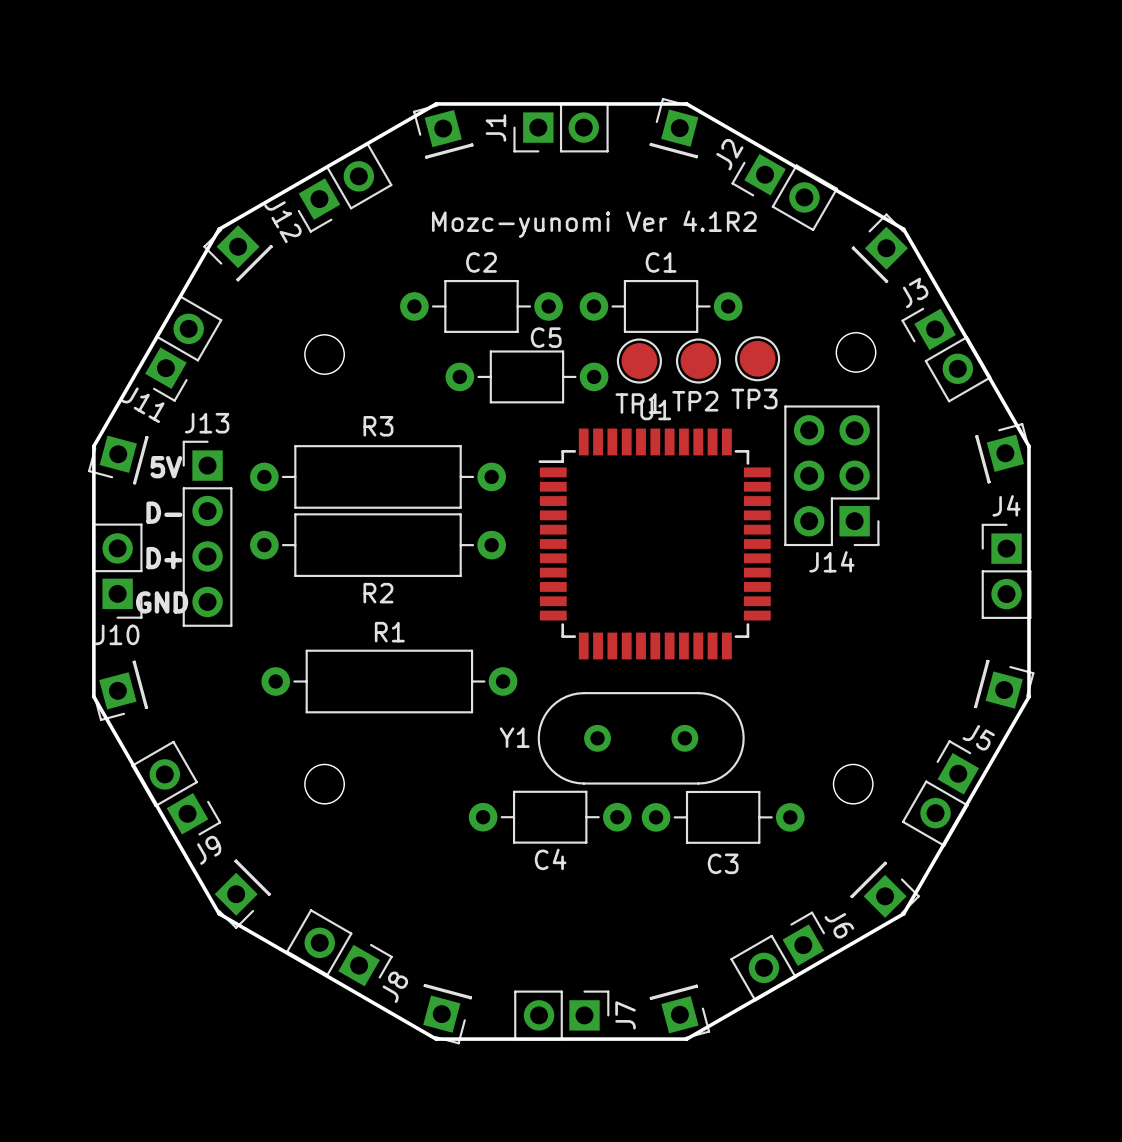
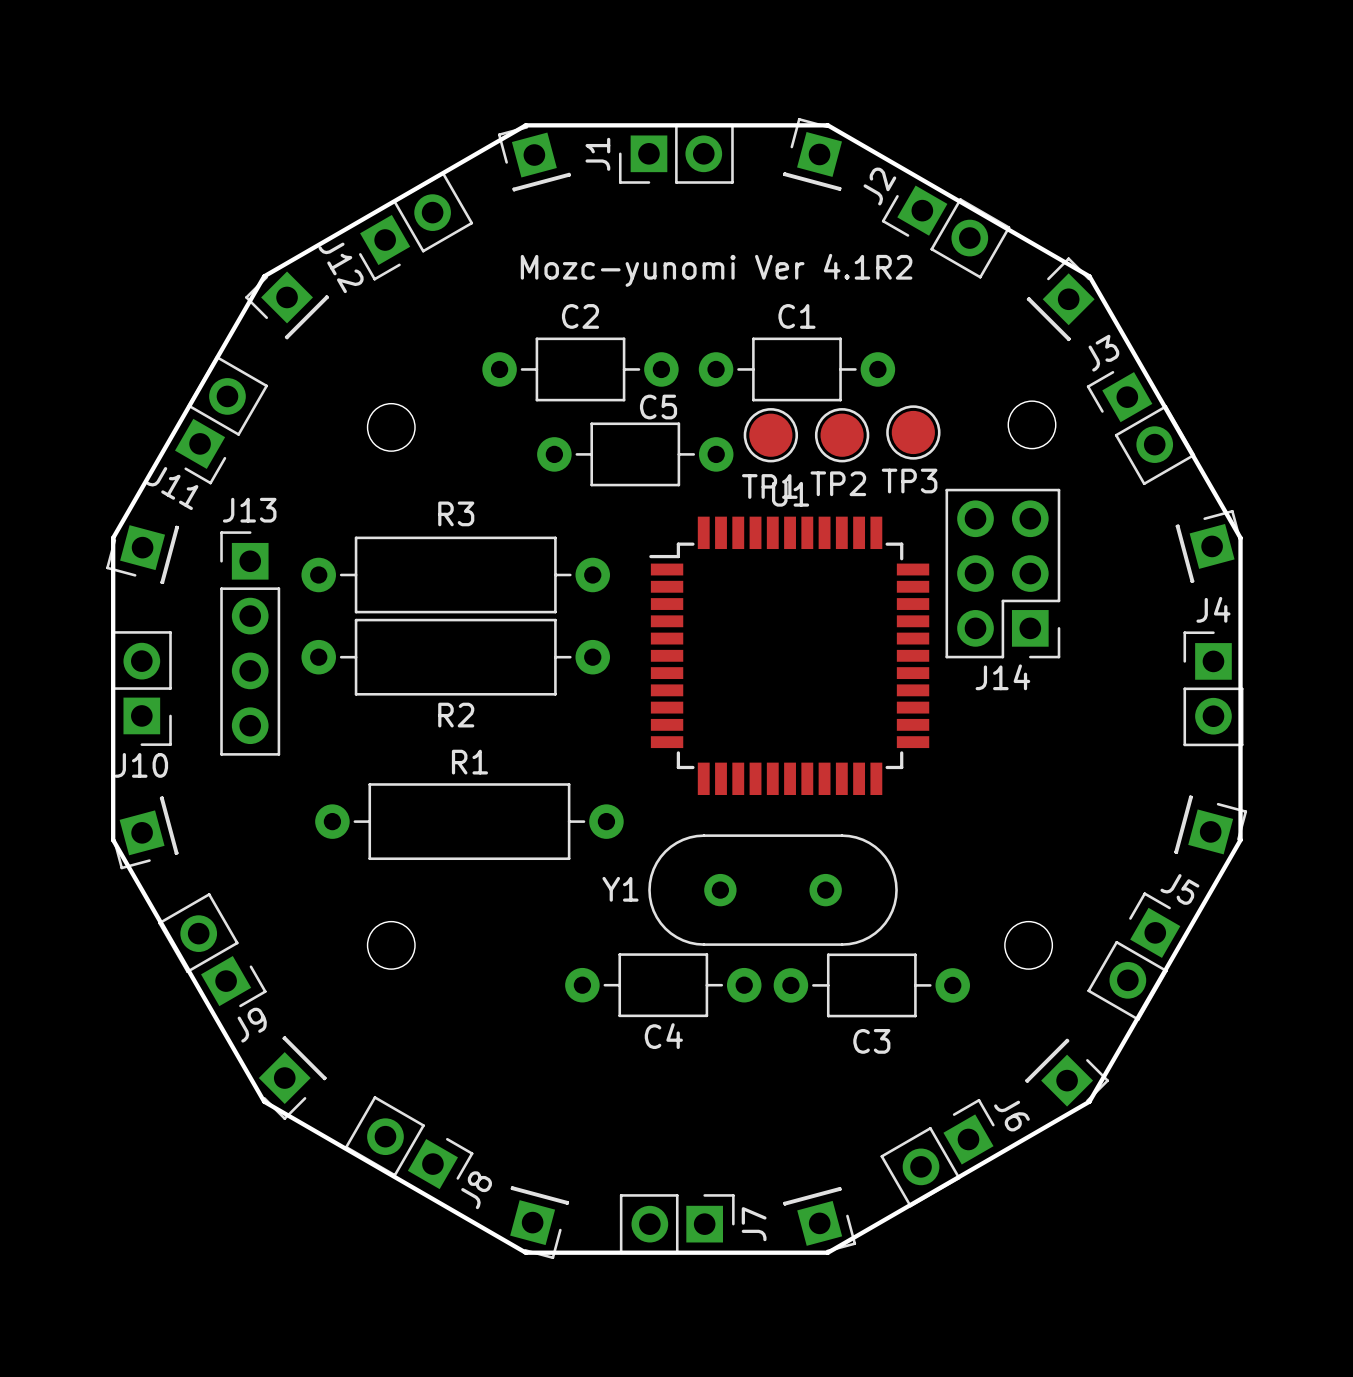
text: 5V (166, 467) -> none
text: D- (164, 512) -> none
text: D+ (164, 558) -> none
text: GND (162, 602) -> none

